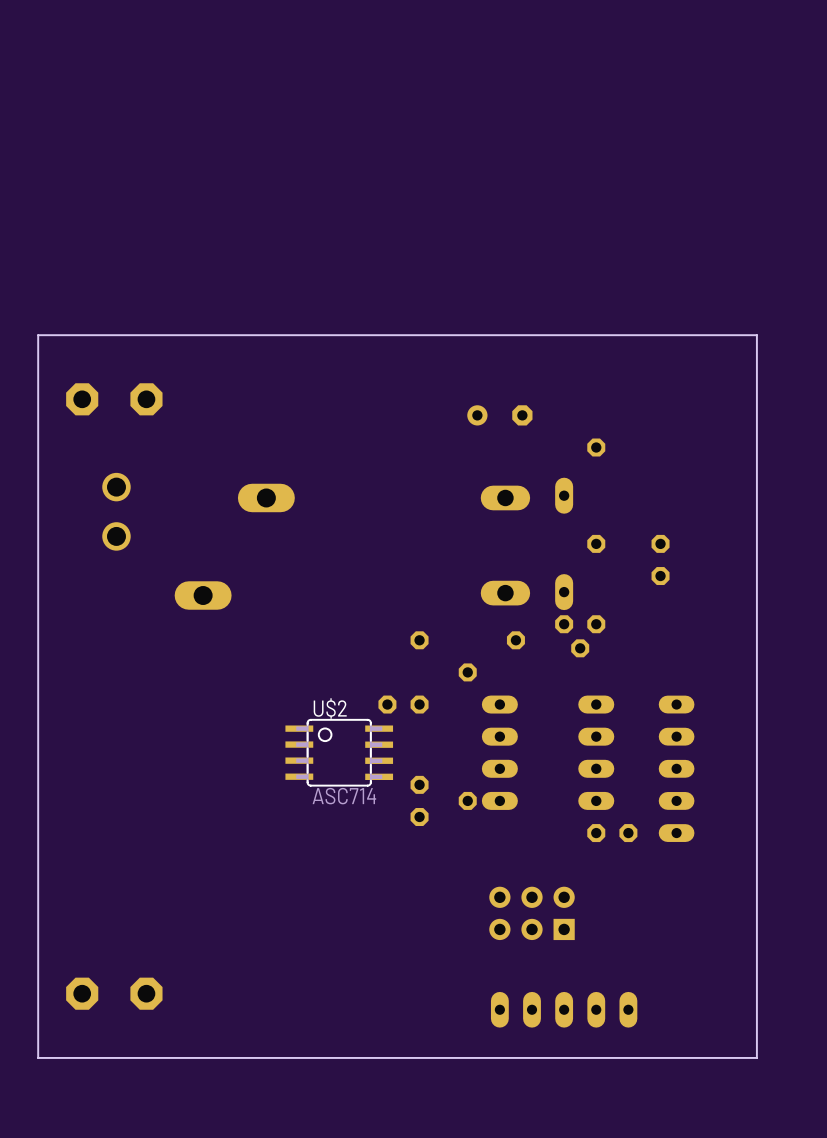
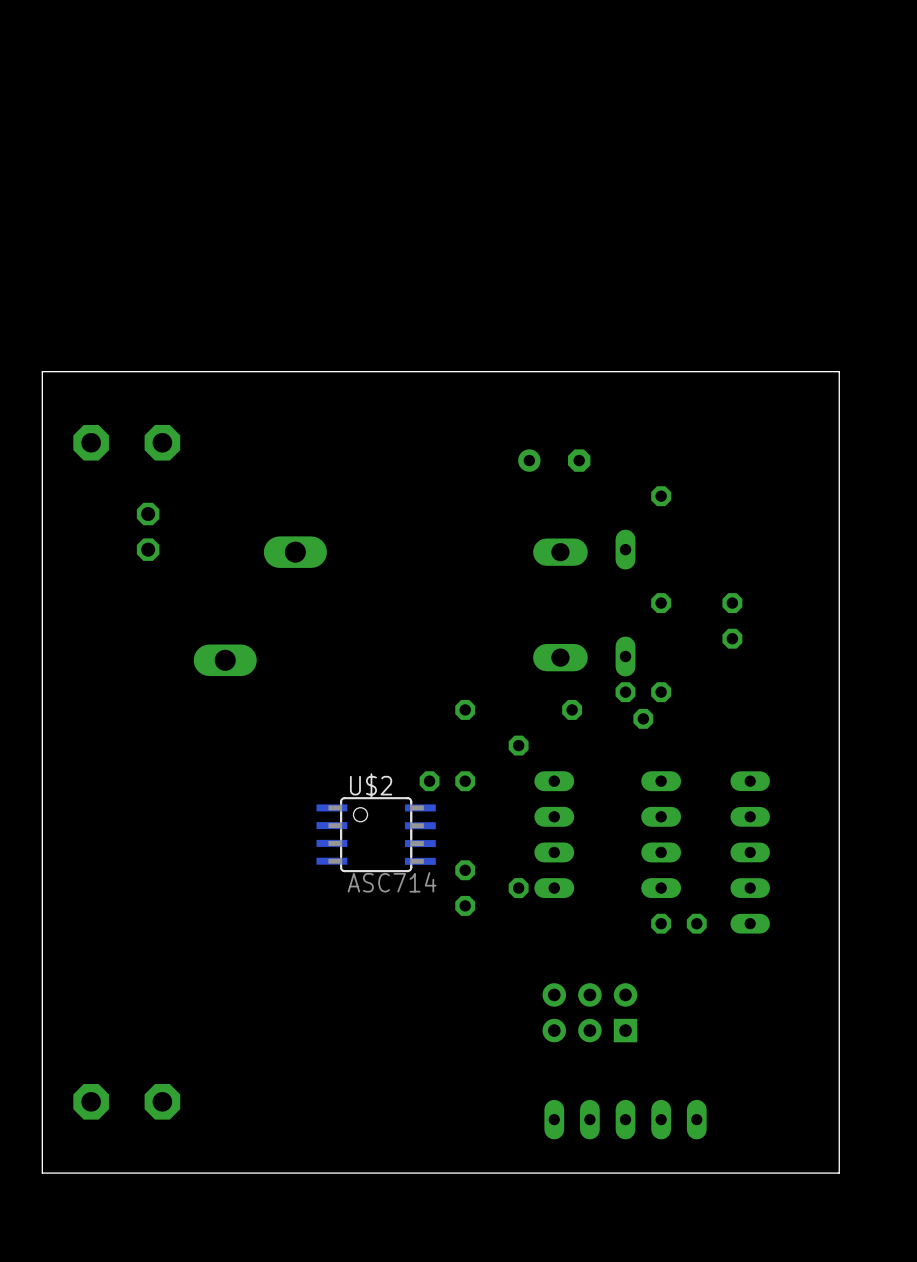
part: none -> (148, 531)
part: (116, 511) -> none

